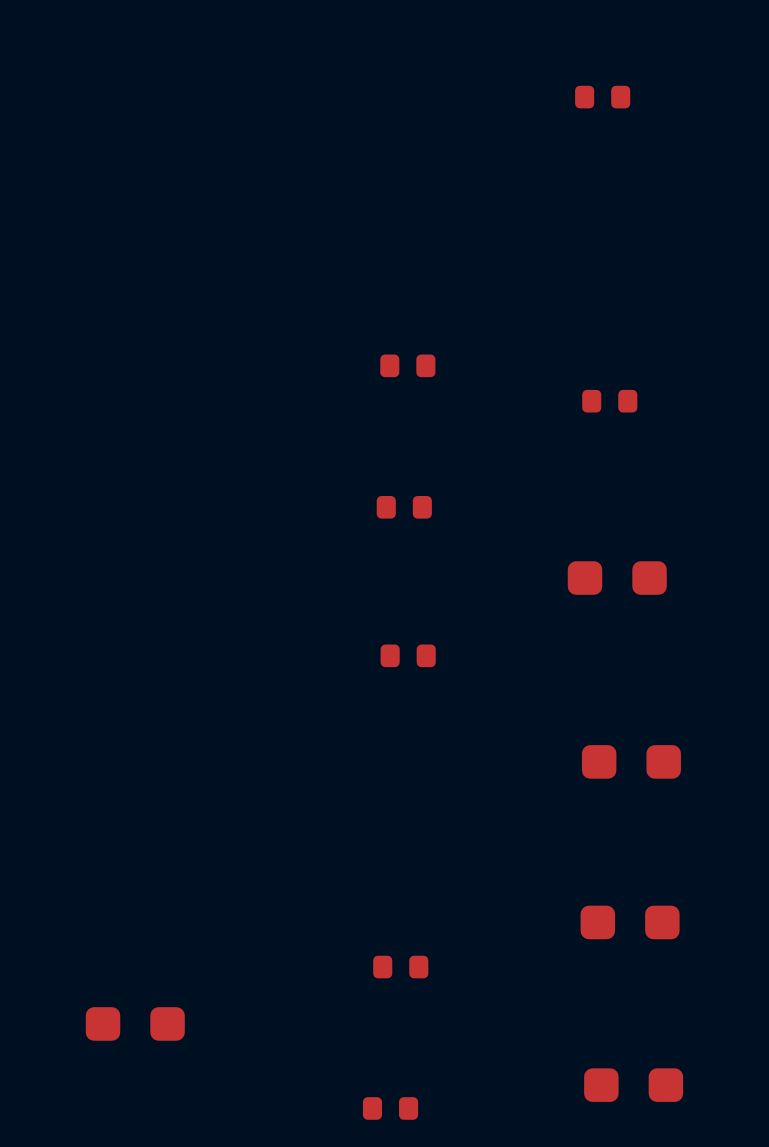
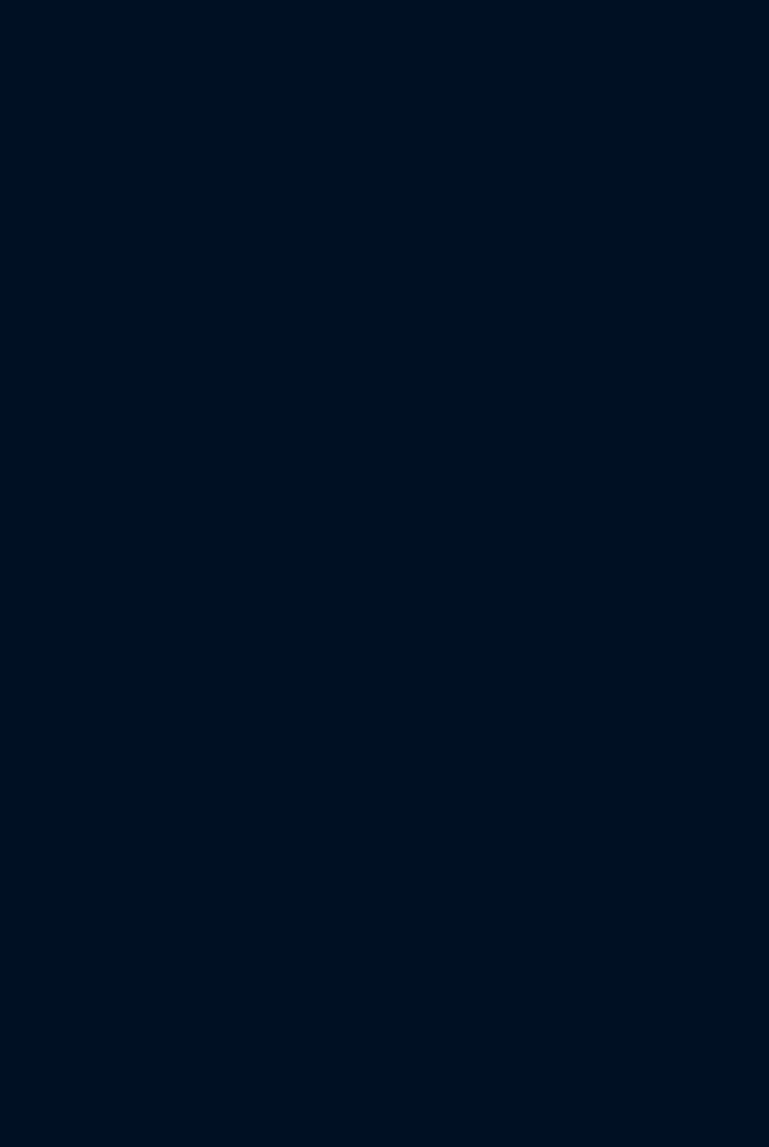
part: (602, 97) -> none
part: (407, 365) -> none
part: (609, 401) -> none
part: (404, 507) -> none
part: (617, 578) -> none
part: (408, 655) -> none
part: (631, 761) -> none
part: (630, 922) -> none
part: (400, 967) -> none
part: (135, 1023) -> none
part: (633, 1085) -> none
part: (390, 1108) -> none

